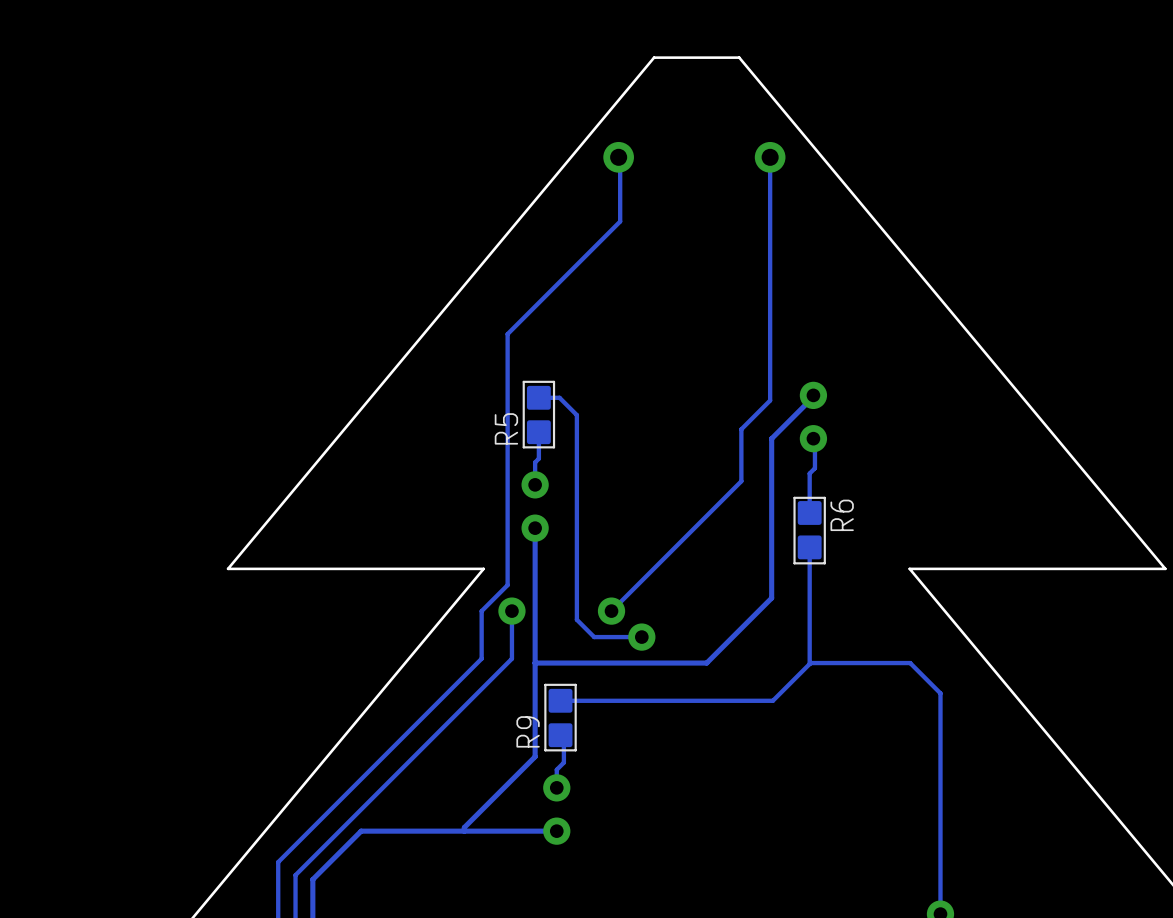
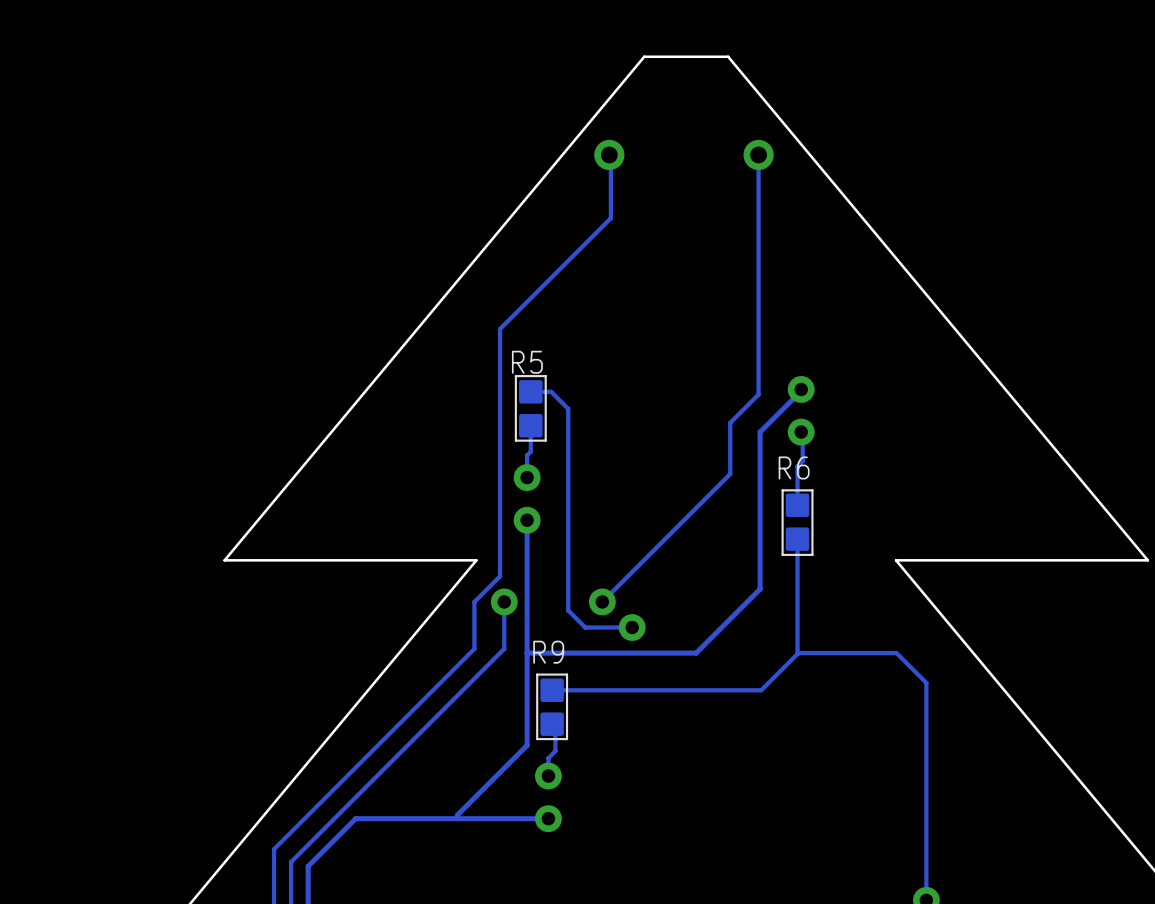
R5 name rotation: 0° (506, 428) -> 90° clockwise (527, 362)
R5 name position: R5 (506, 428) -> R5 (527, 362)
R6 name rotation: 0° (842, 515) -> 90° clockwise (794, 467)
R6 name position: R6 (842, 515) -> R6 (794, 467)
R9 name rotation: 0° (528, 731) -> 90° clockwise (548, 652)
R9 name position: R9 (528, 731) -> R9 (548, 652)

